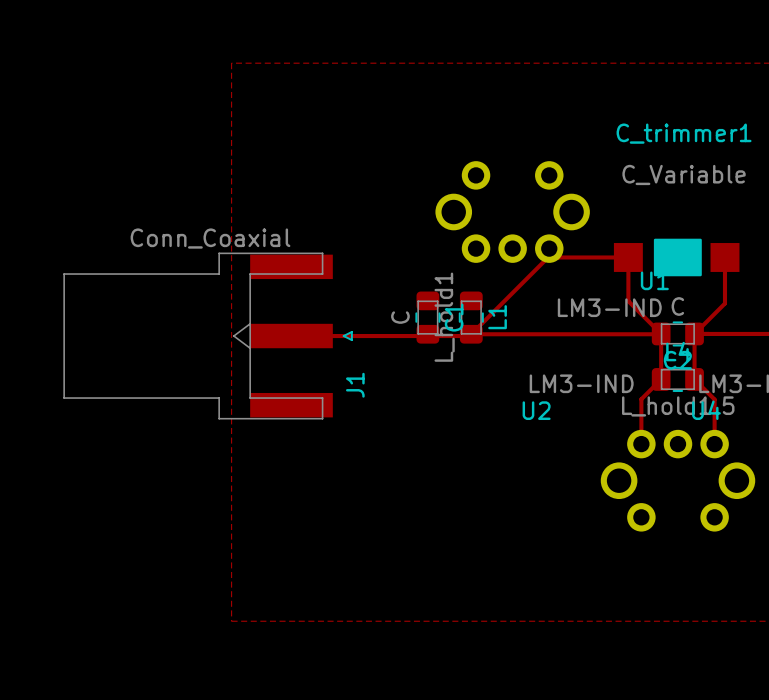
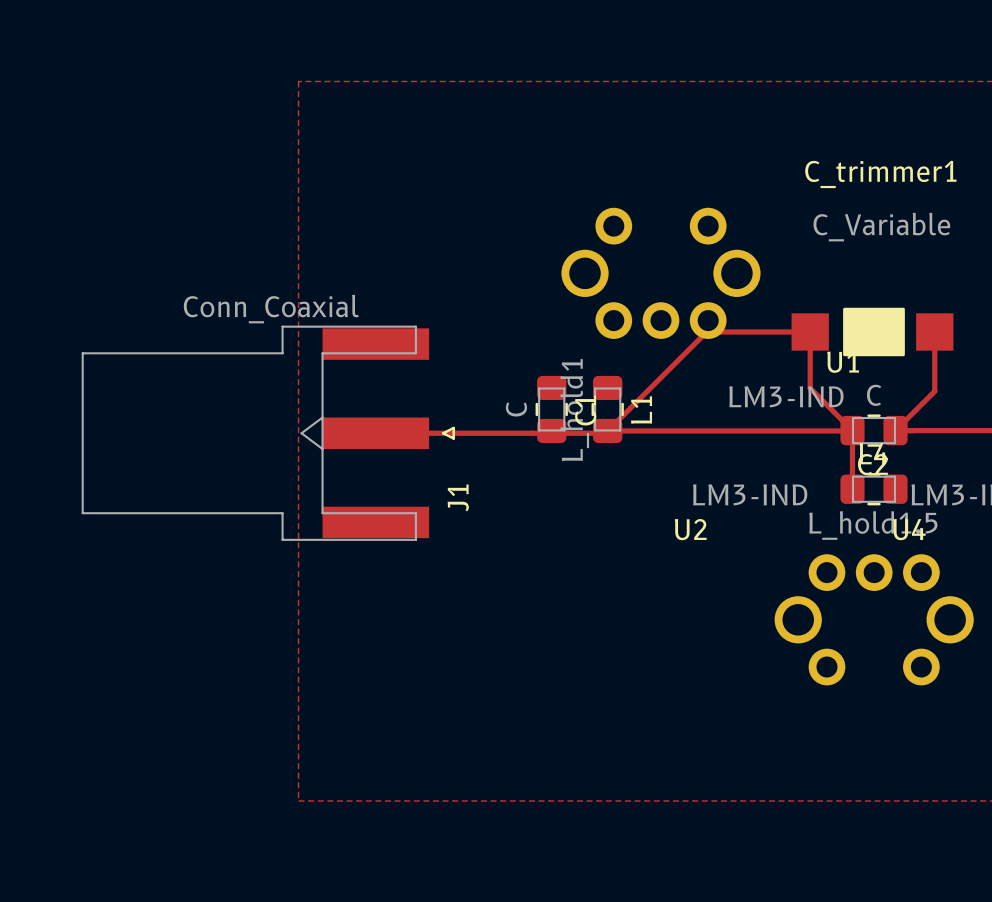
track: (694, 333) (694, 379) (714, 399) (714, 444) -> none
track: (661, 379) (641, 399) (641, 444) -> none

